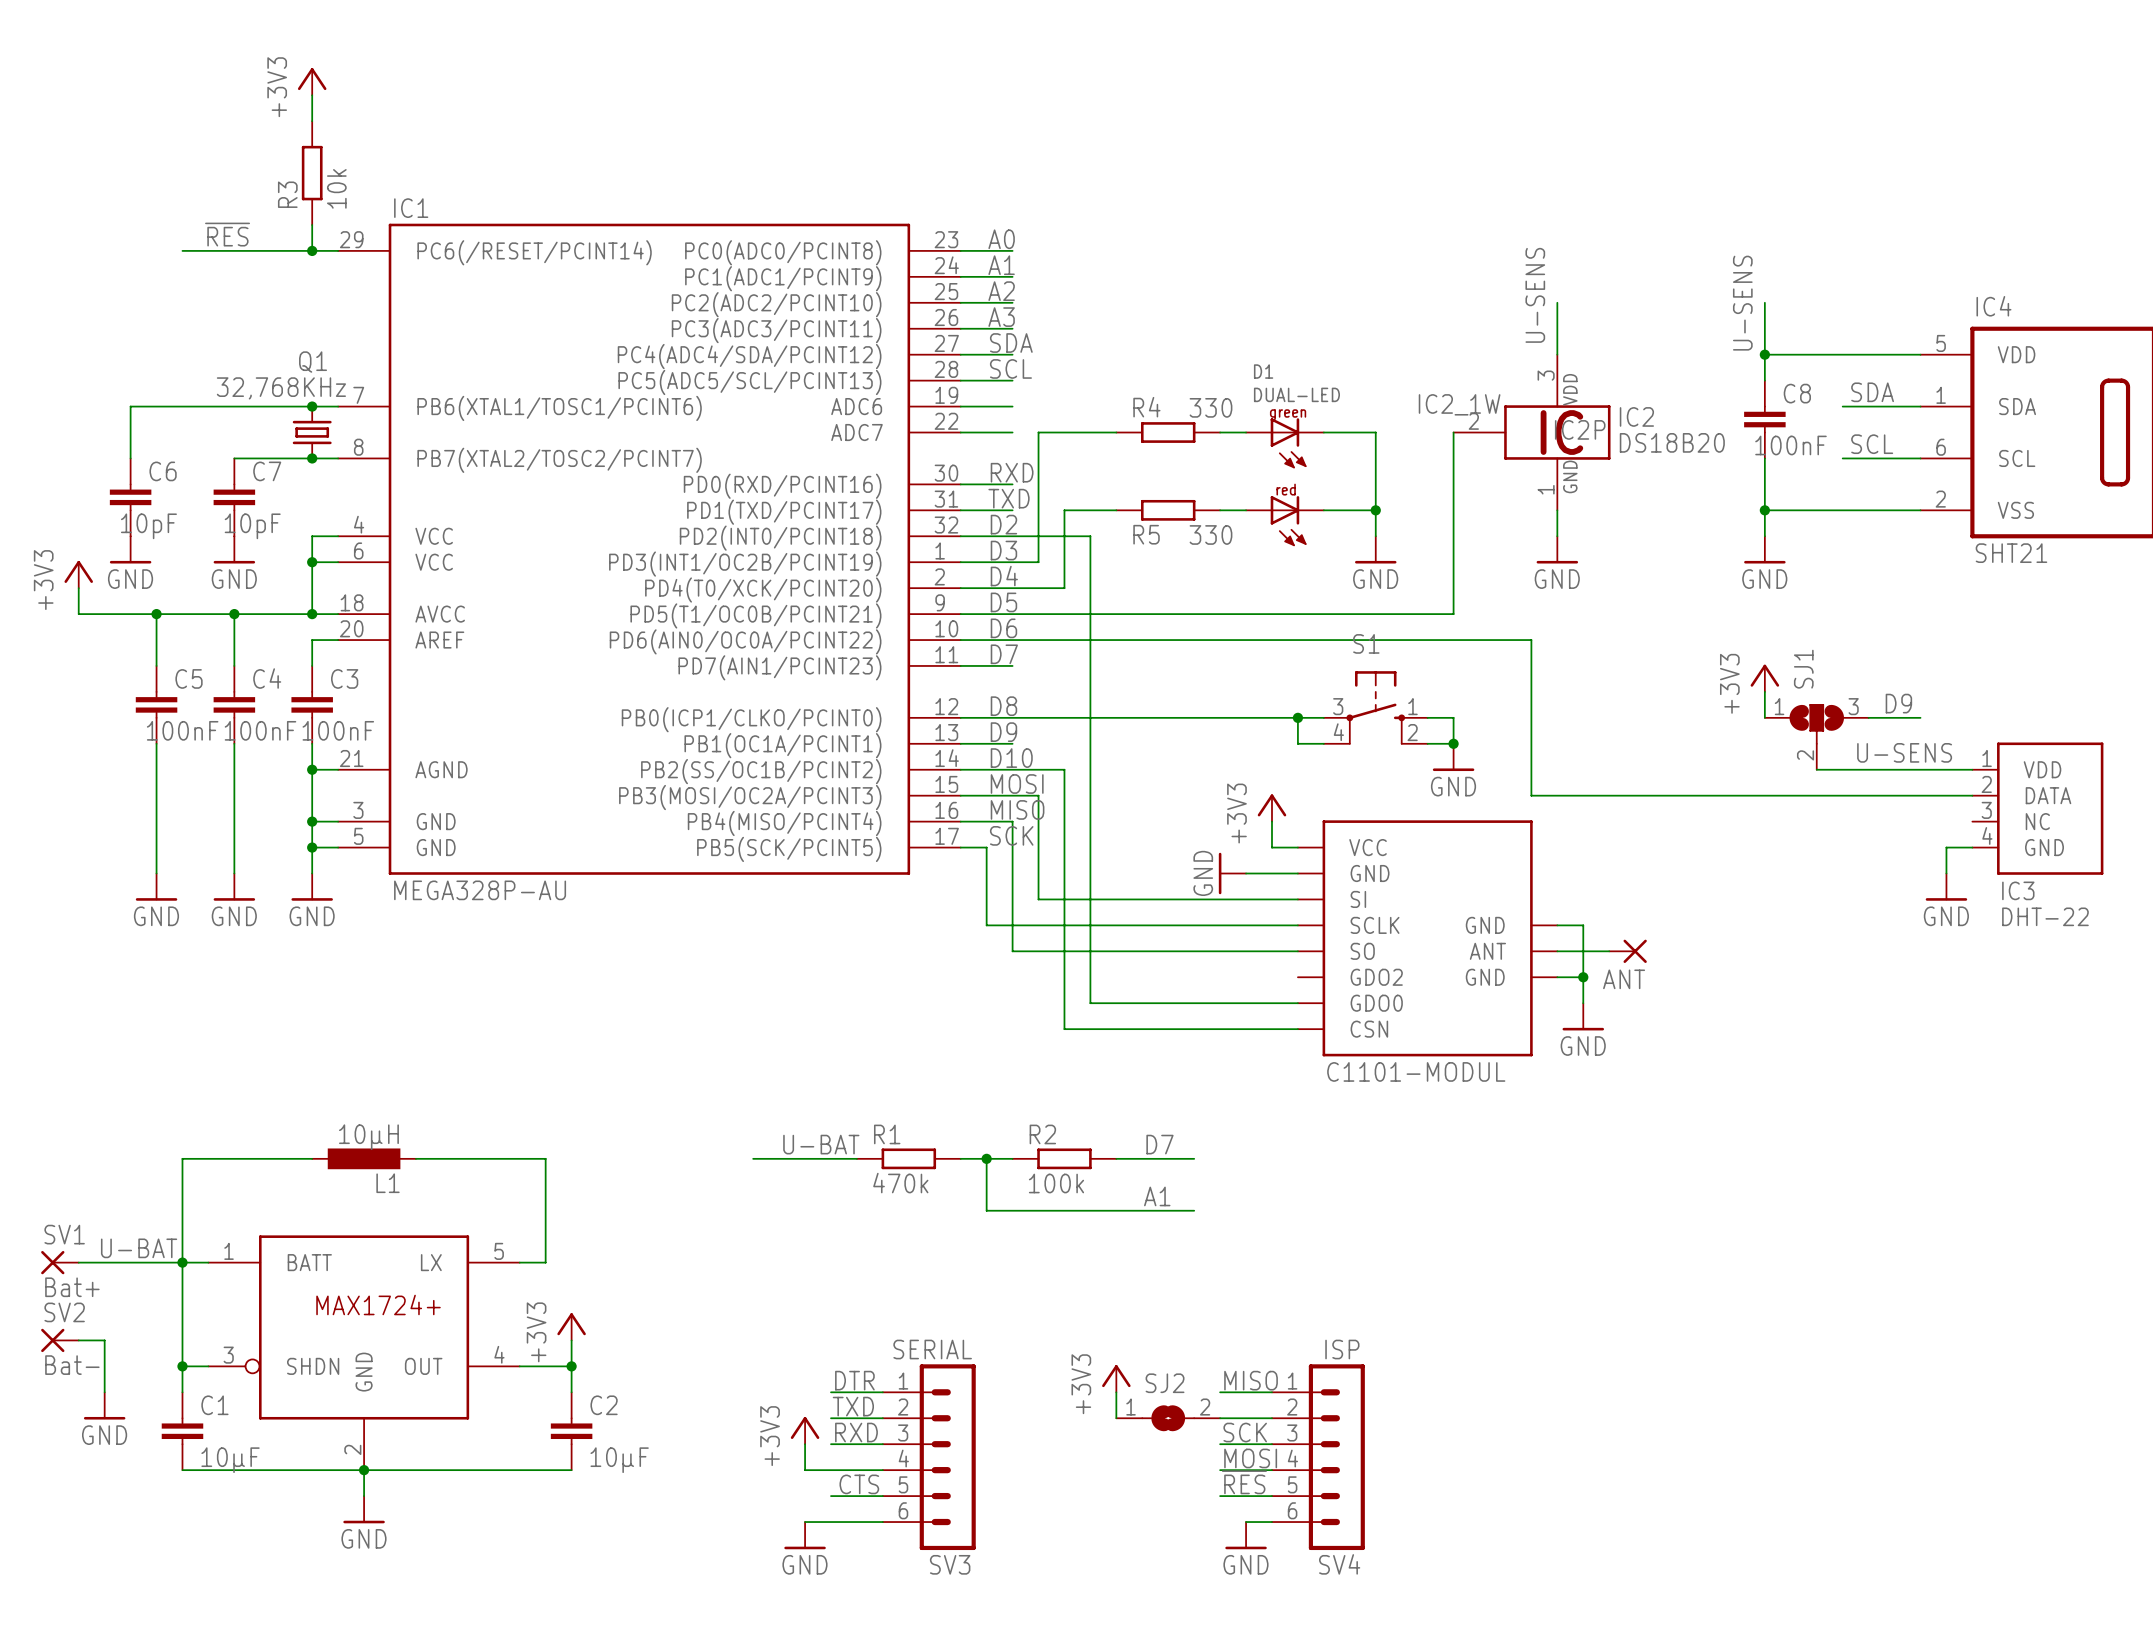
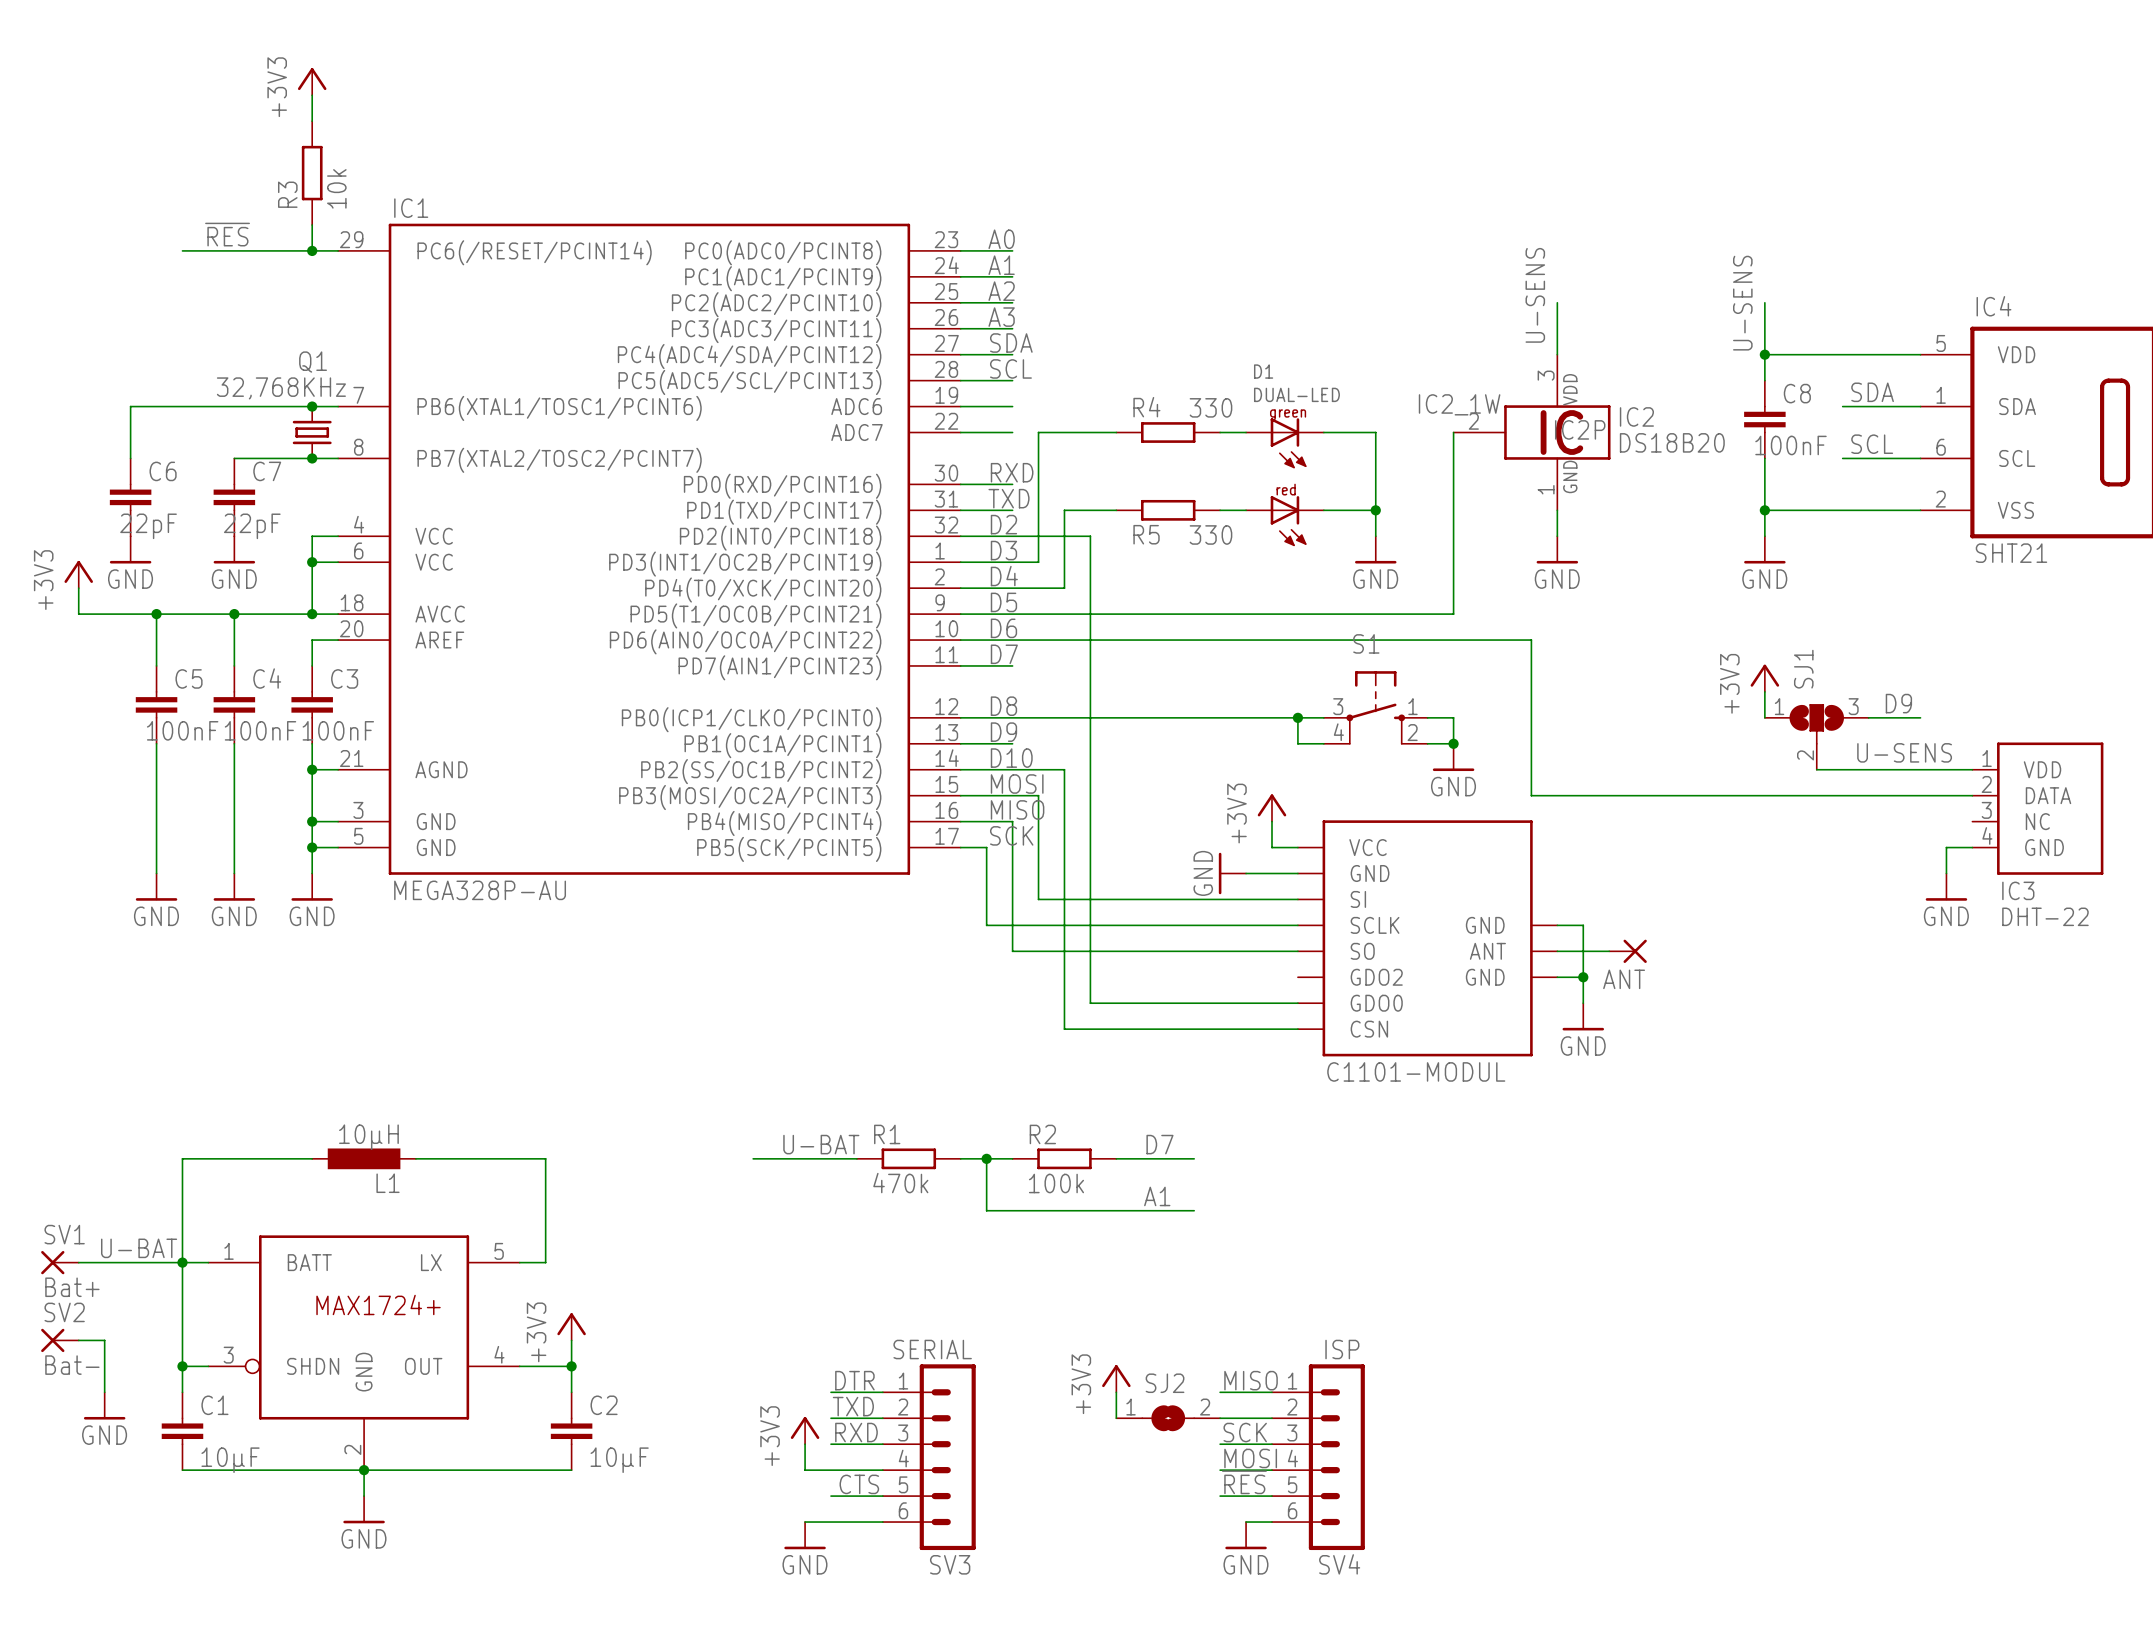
C6 value: 10pF (148, 526) -> 22pF (148, 526)
C7 value: 10pF (252, 526) -> 22pF (252, 526)

